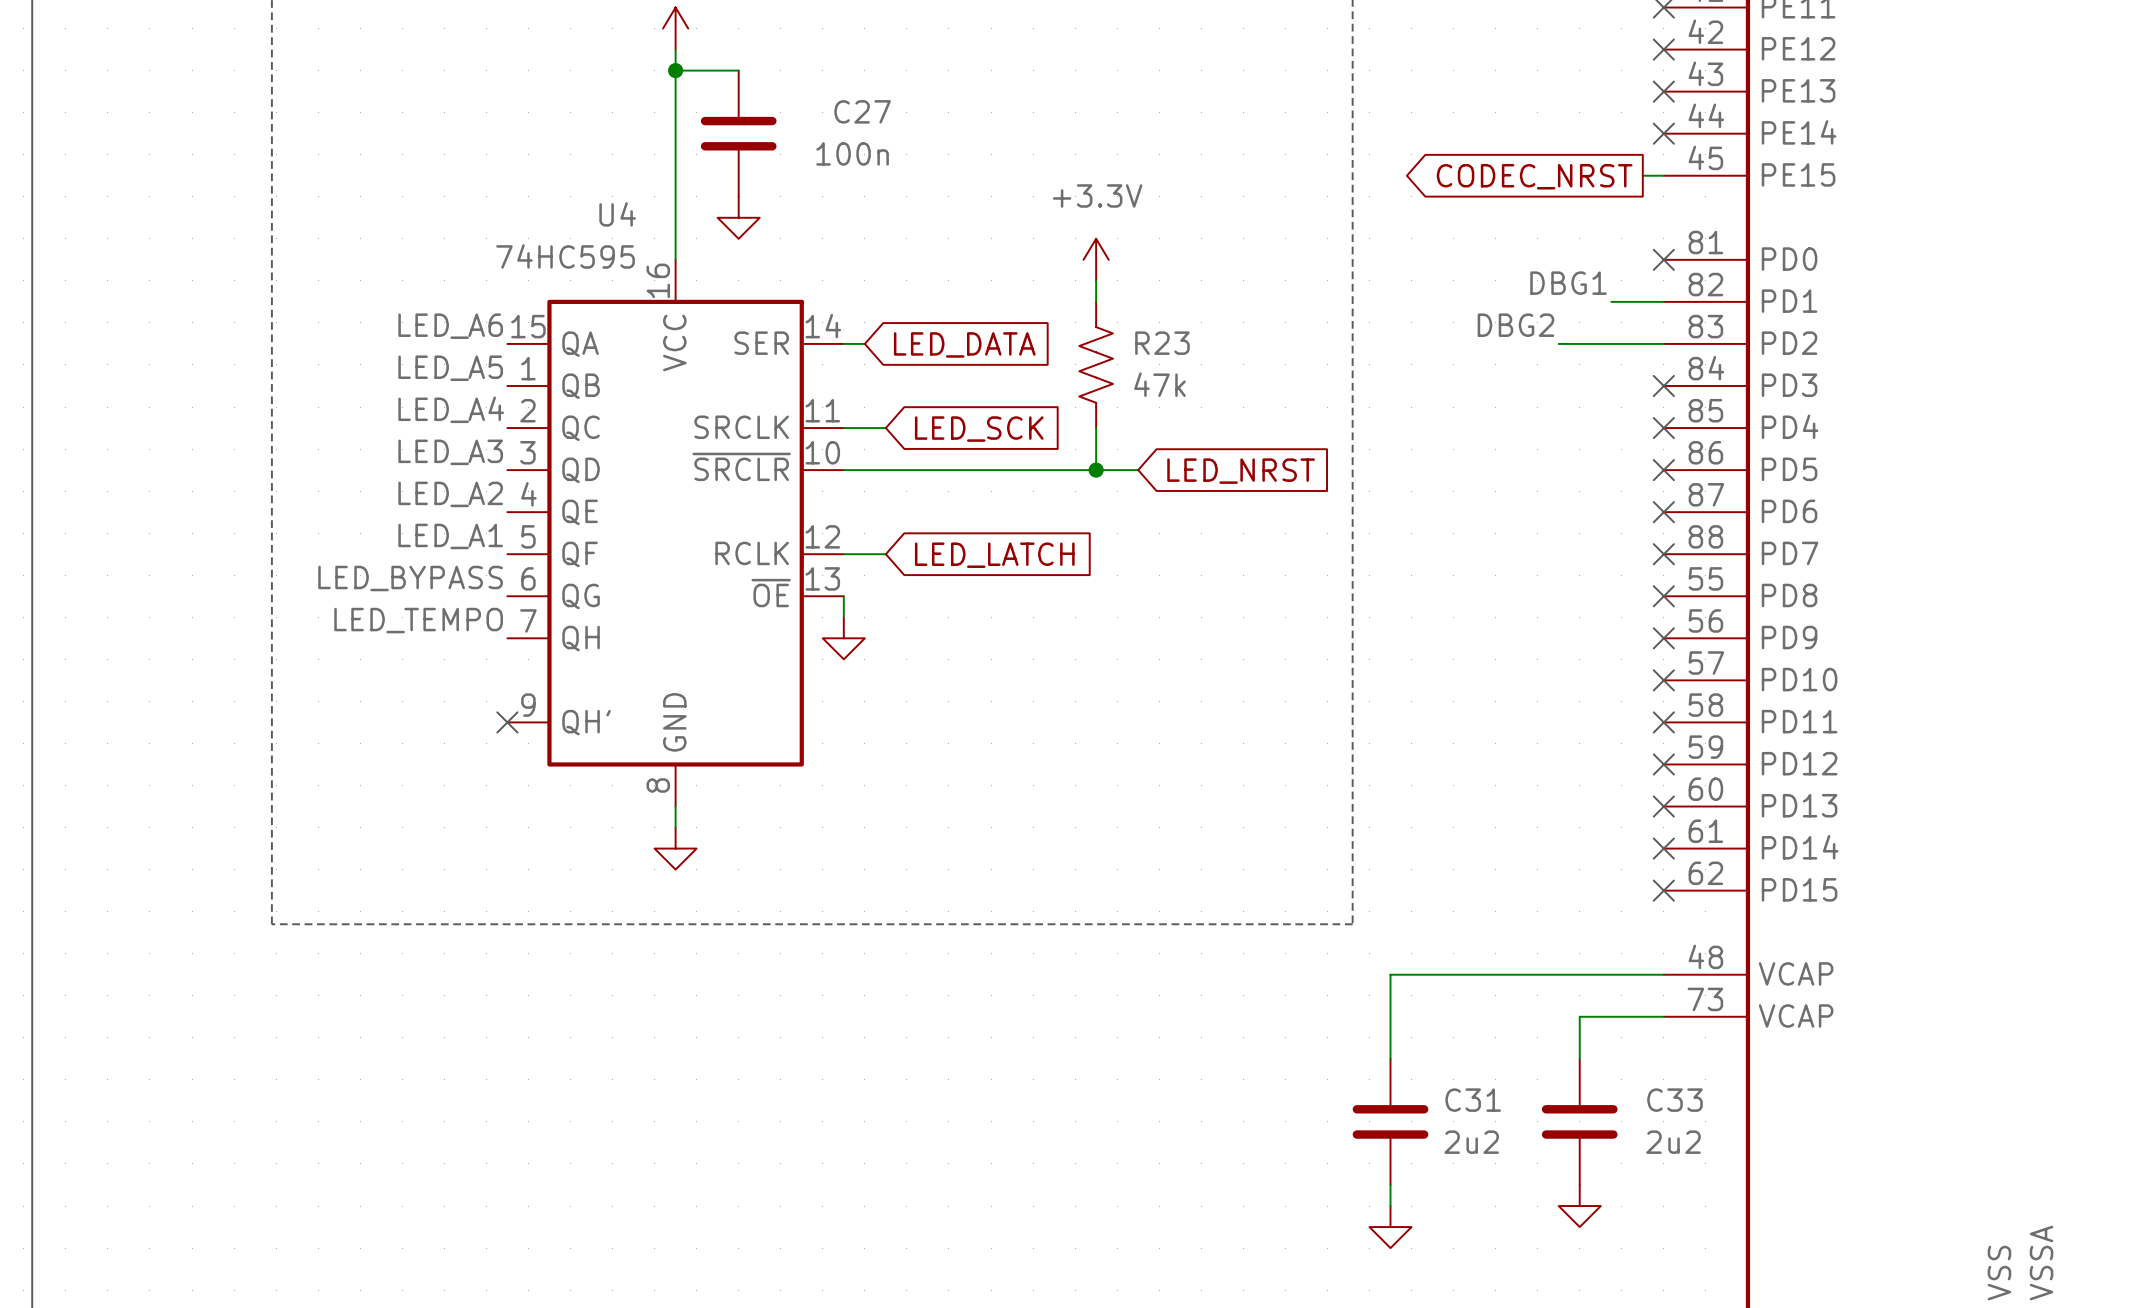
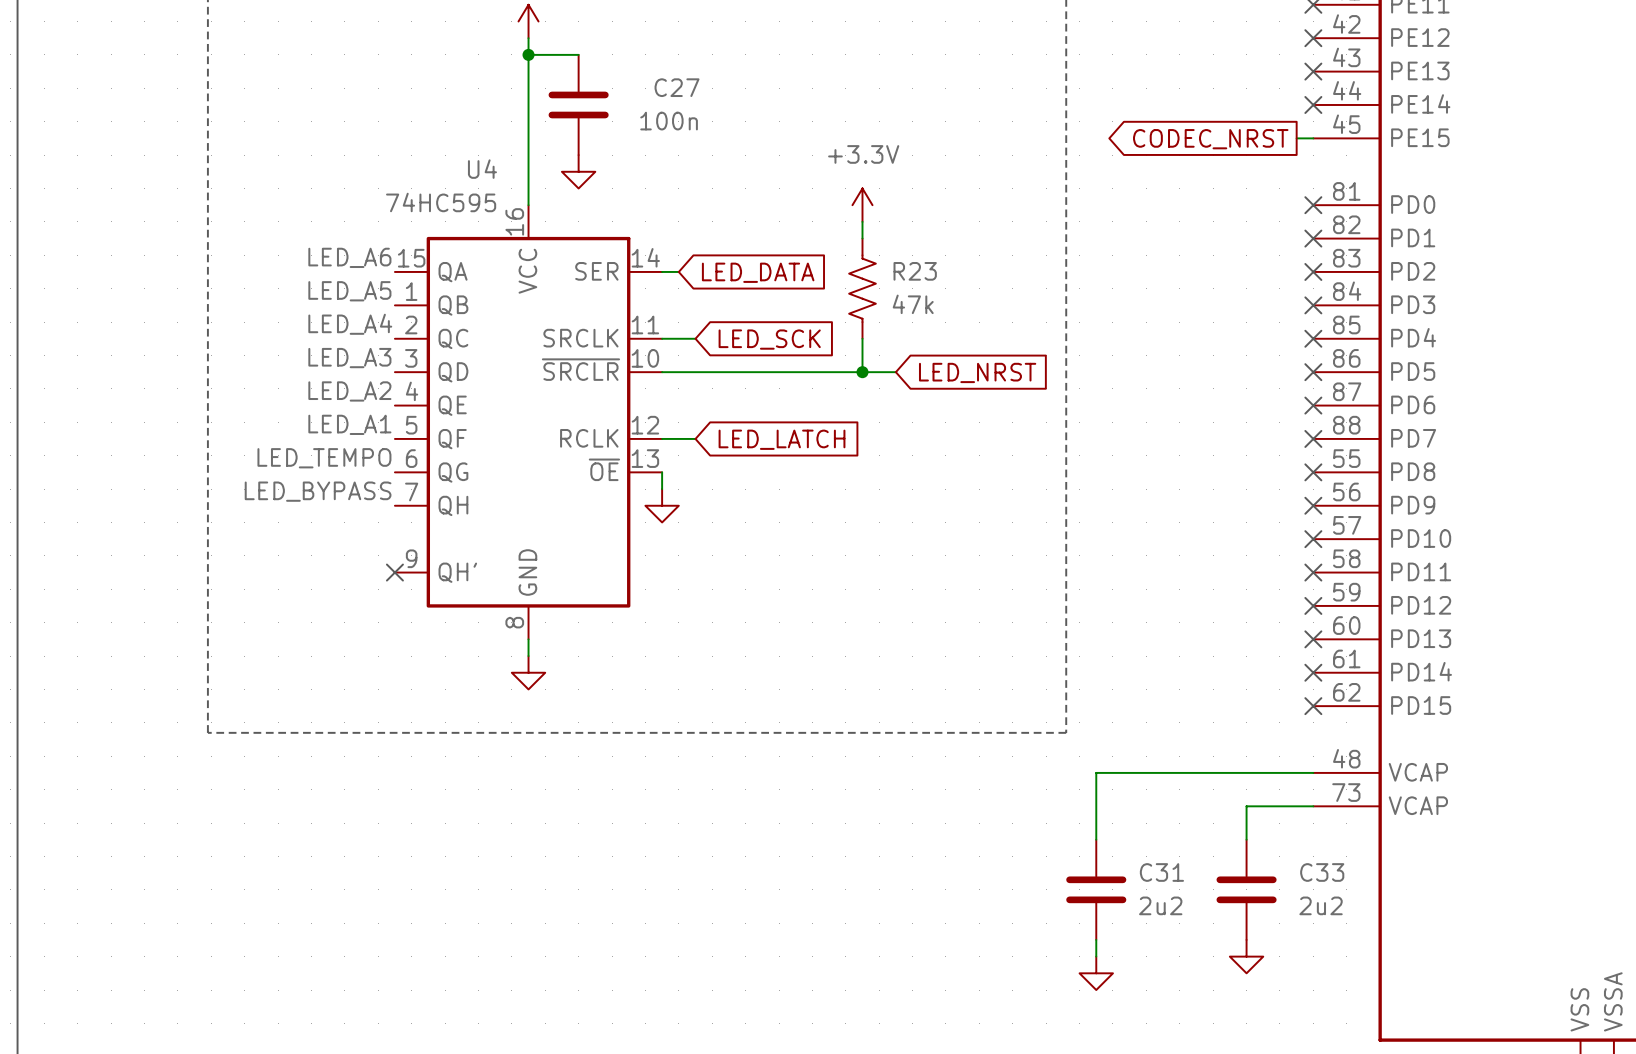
label: DBG1 (1568, 283) -> none
wire: (1611, 301) (1663, 301) -> none
no-connect mark: none -> (1313, 238)
label: DBG2 (1516, 325) -> none
wire: (1558, 343) (1663, 343) -> none
no-connect mark: none -> (1313, 271)
label: LED_BYPASS (410, 578) -> LED_TEMPO (324, 458)
label: LED_TEMPO (418, 620) -> LED_BYPASS (318, 491)

